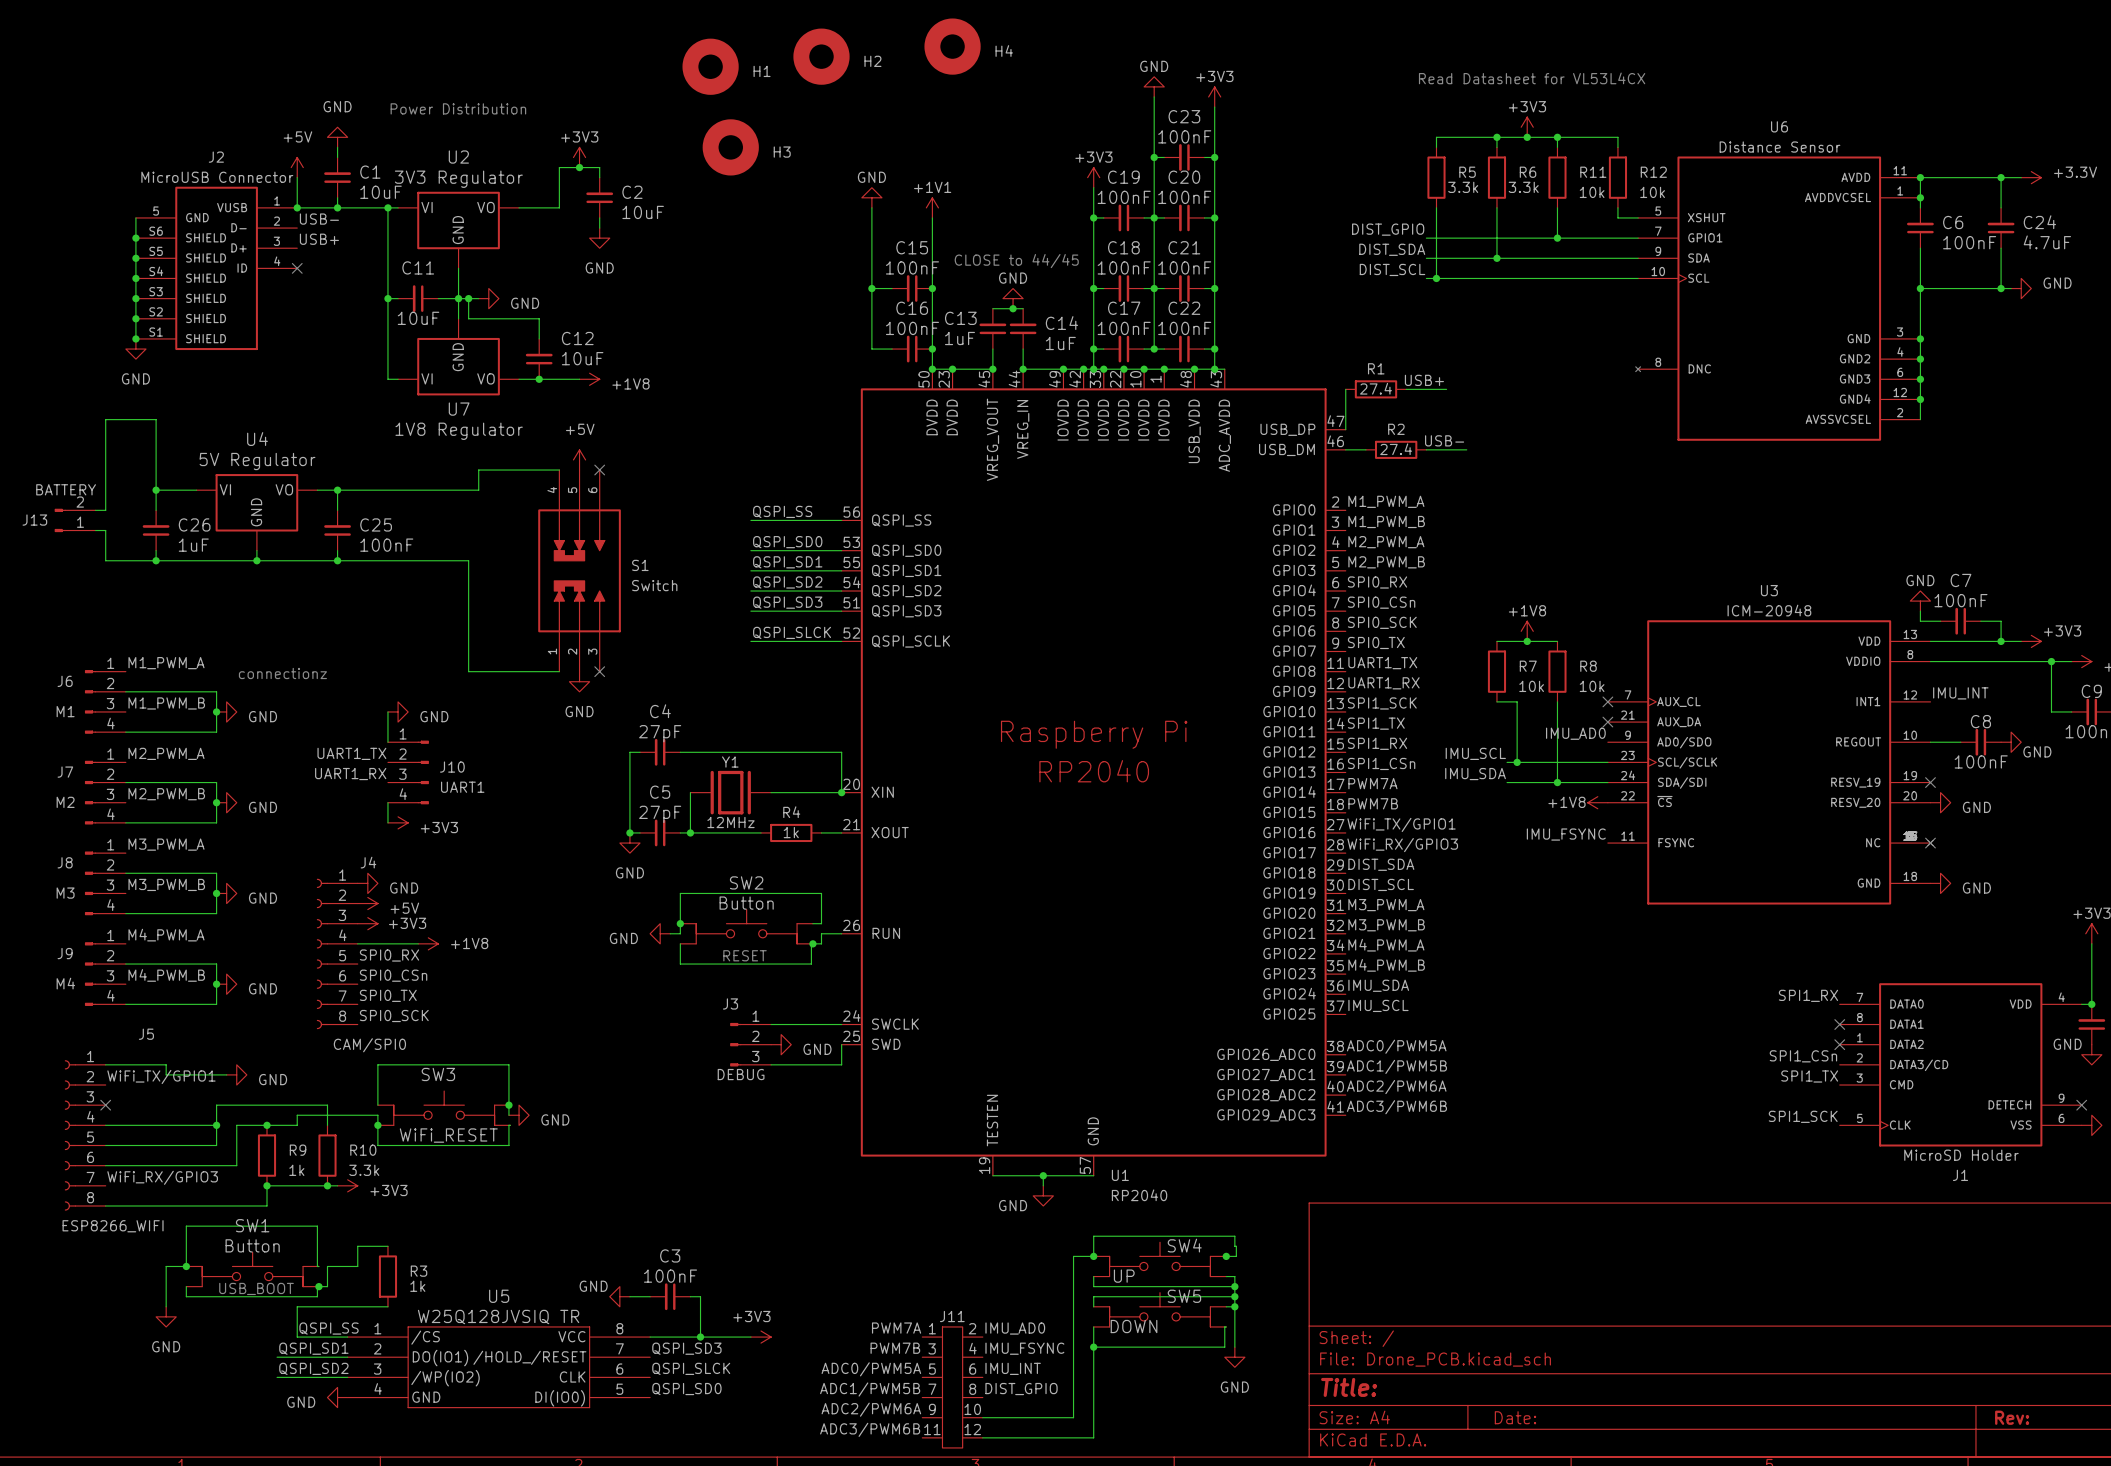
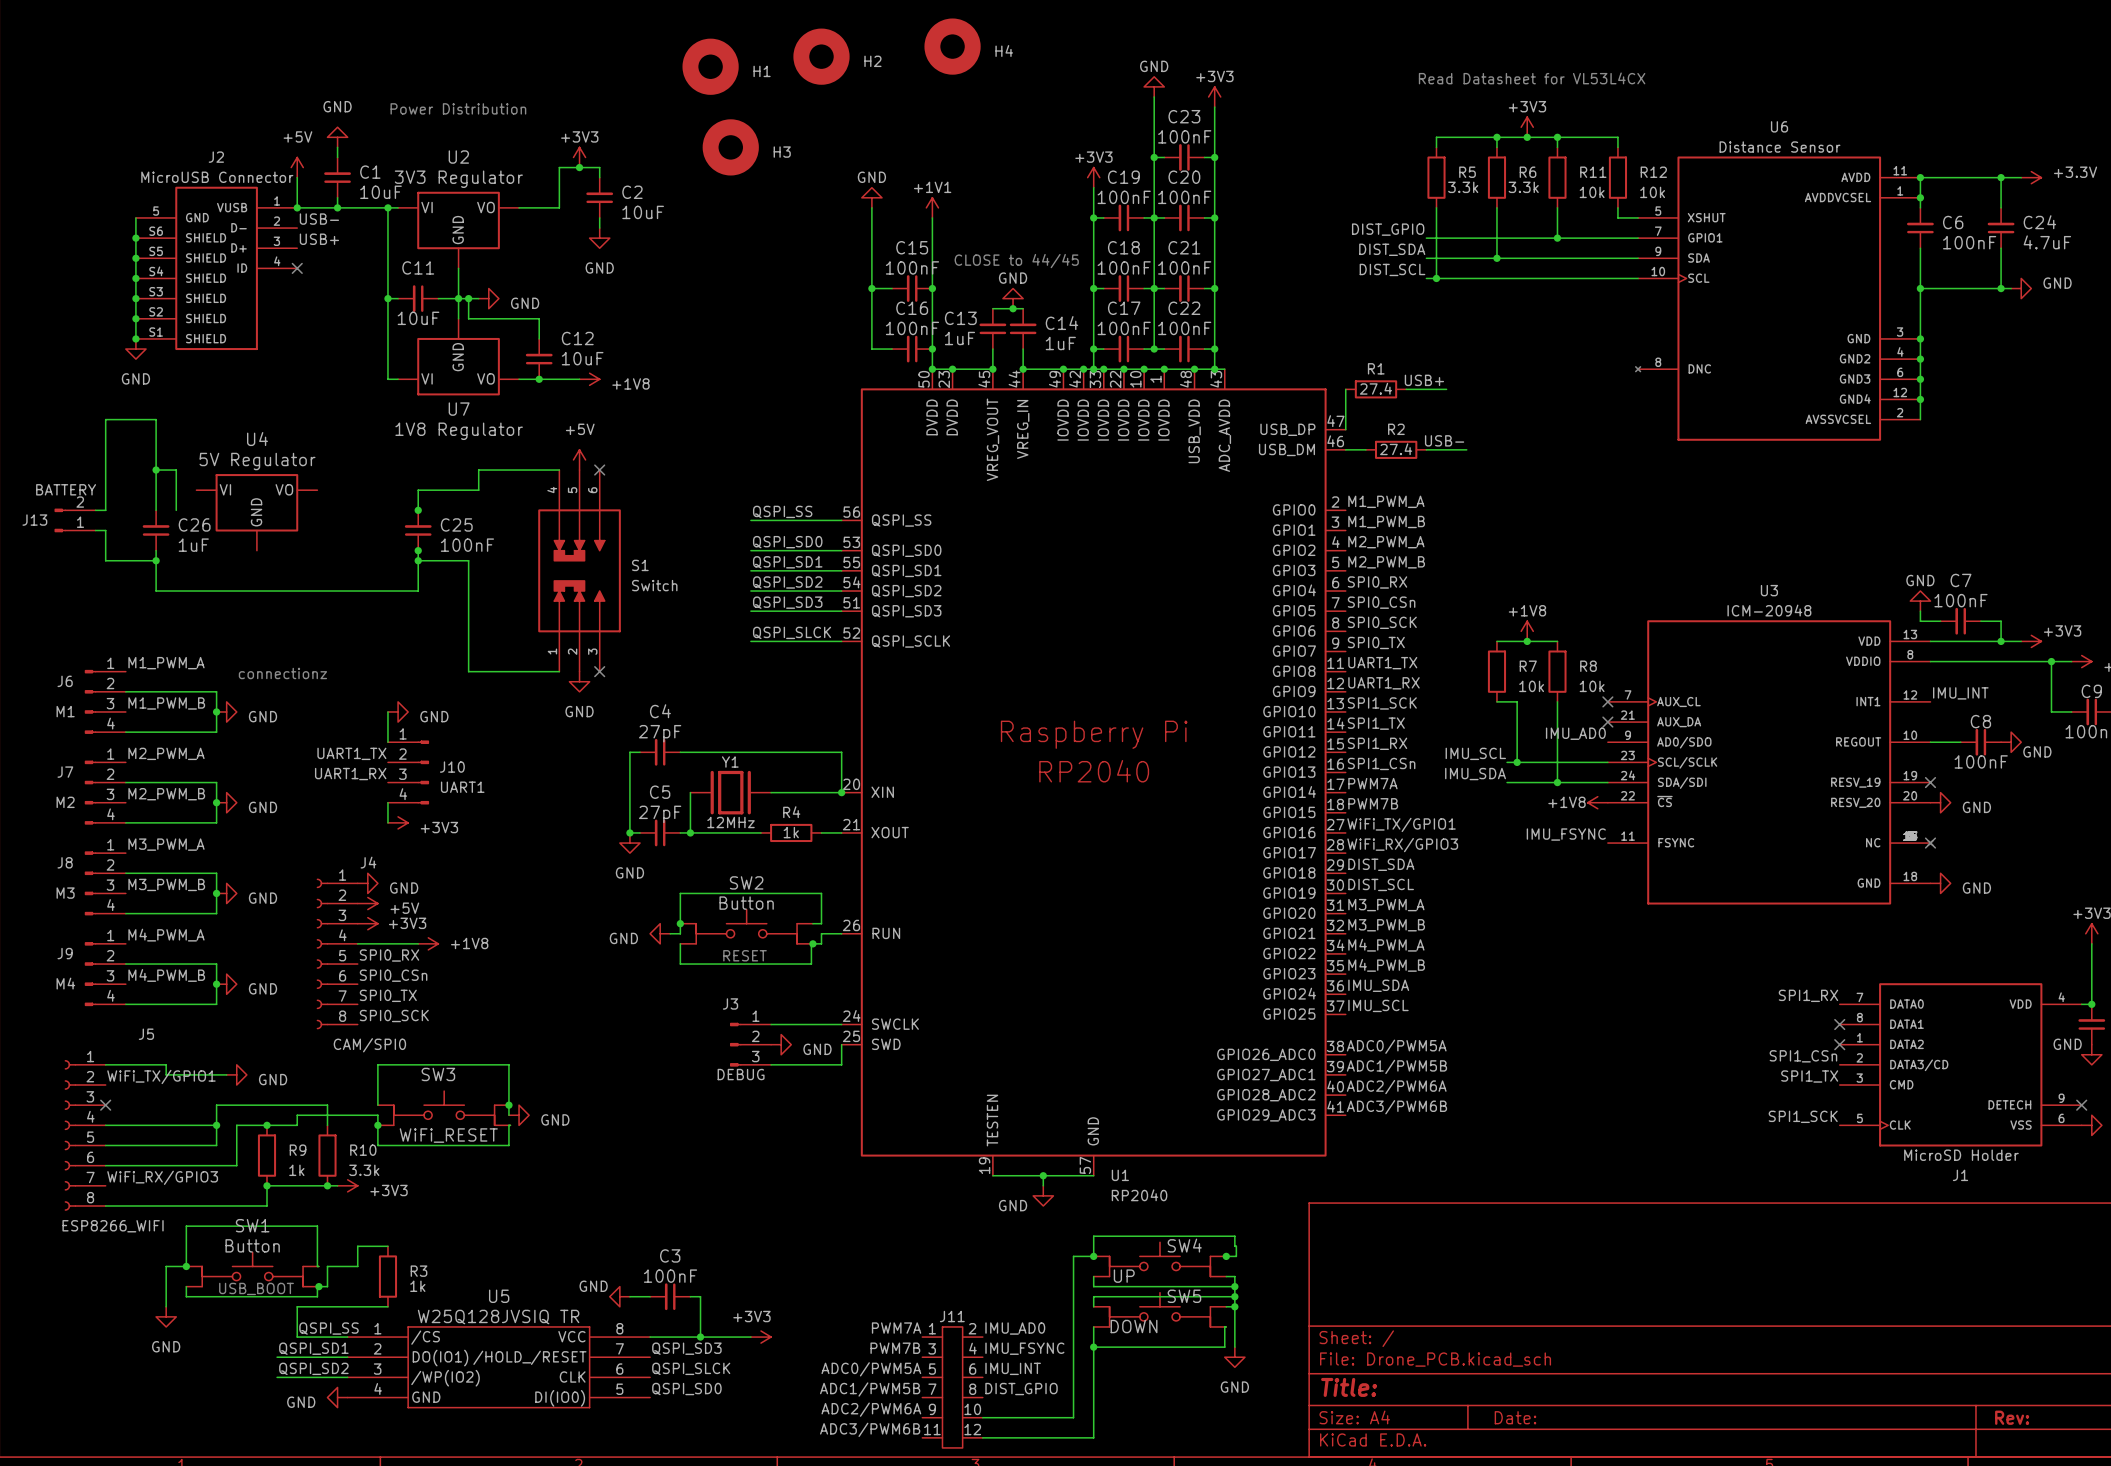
wire: none -> (156, 470) (176, 470) (176, 510)
wire: (156, 490) (196, 490) -> none
junction position: (156, 490) -> (156, 470)
wire: (317, 490) (418, 490) -> (418, 510) (418, 490)
wire: (337, 490) (337, 510) -> none
junction: (337, 490) -> none
junction: none -> (418, 510)
C25 position: (337, 530) -> (418, 530)
wire: (256, 550) (256, 560) -> none
wire: (337, 550) (337, 560) -> none
junction: none -> (418, 550)
wire: (156, 560) (418, 560) -> (156, 560) (156, 591) (418, 591) (418, 550)
junction: (256, 560) -> none
junction: (337, 560) -> none
junction: none -> (418, 560)

